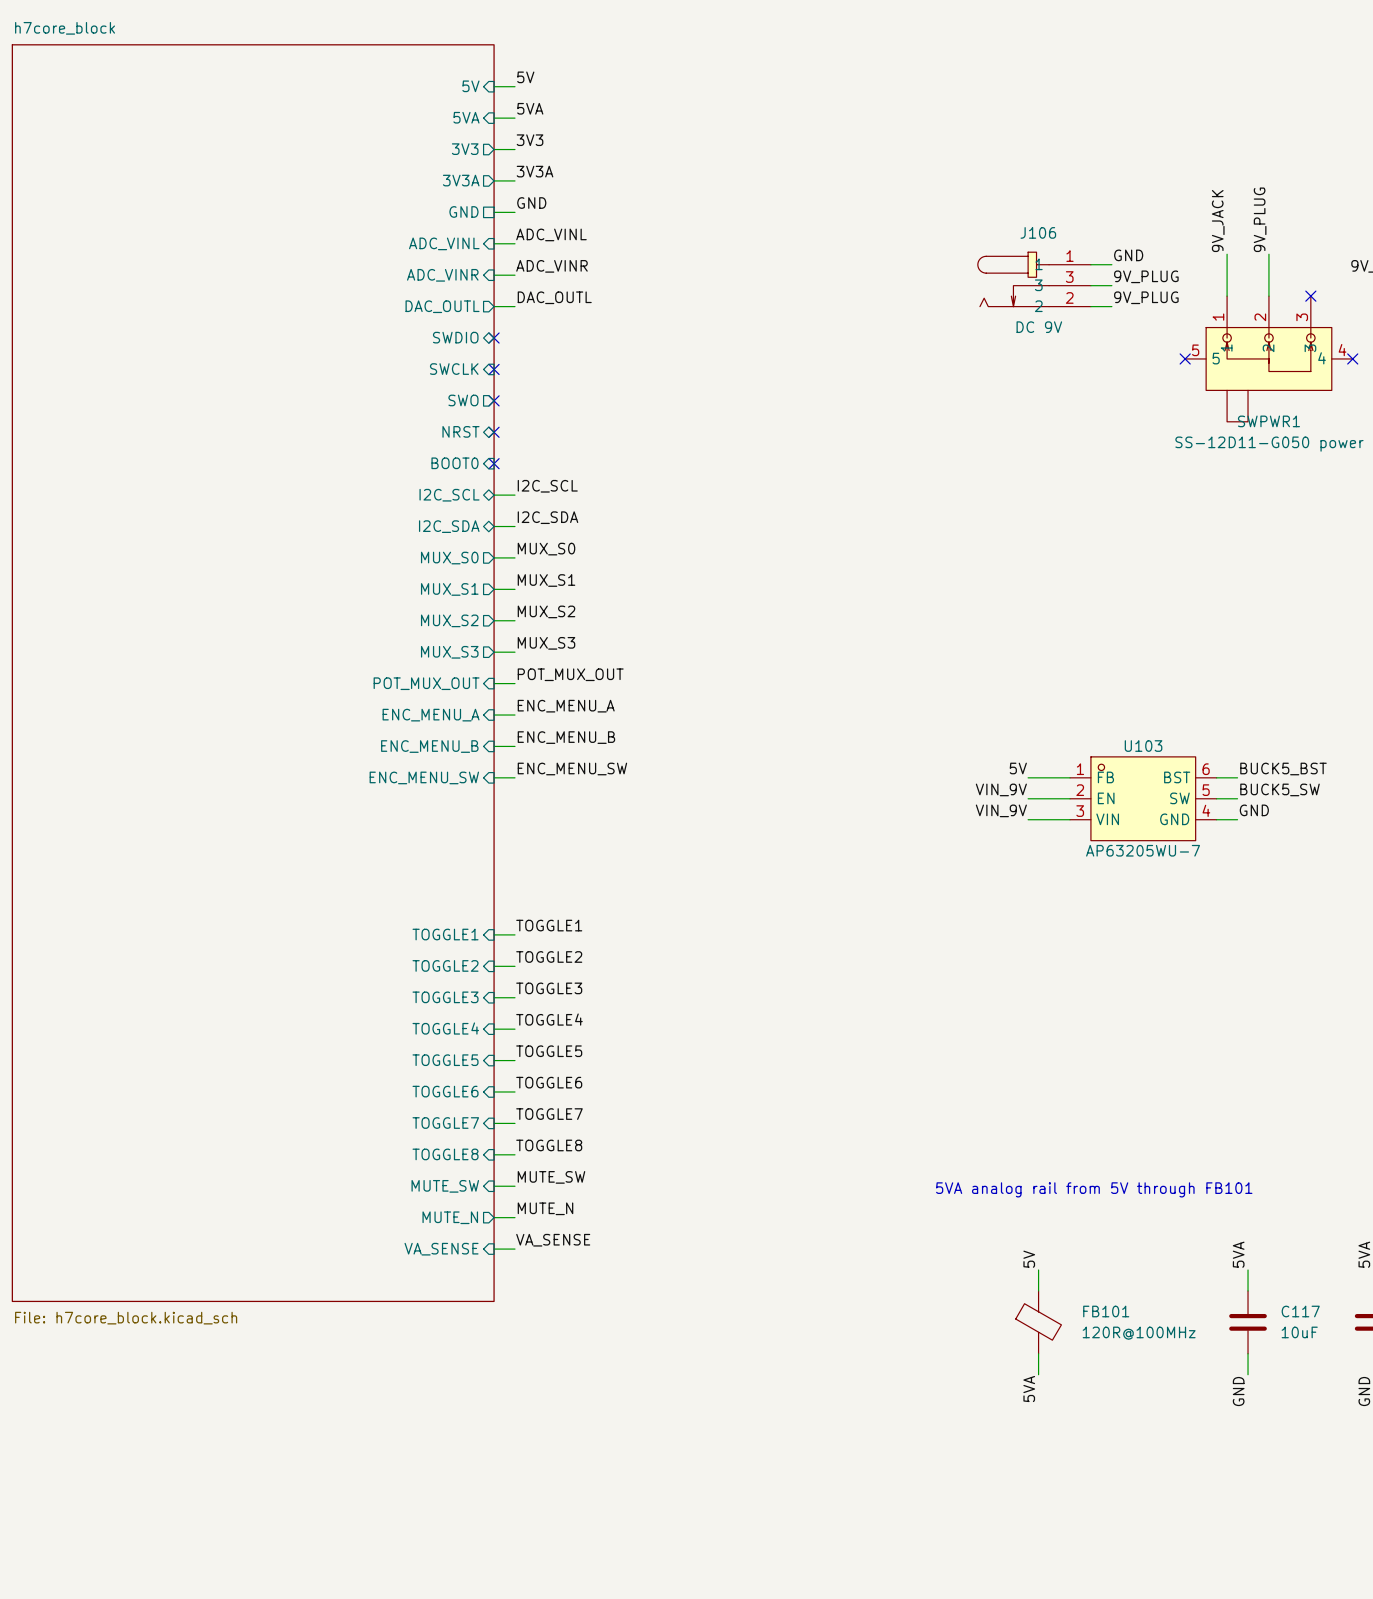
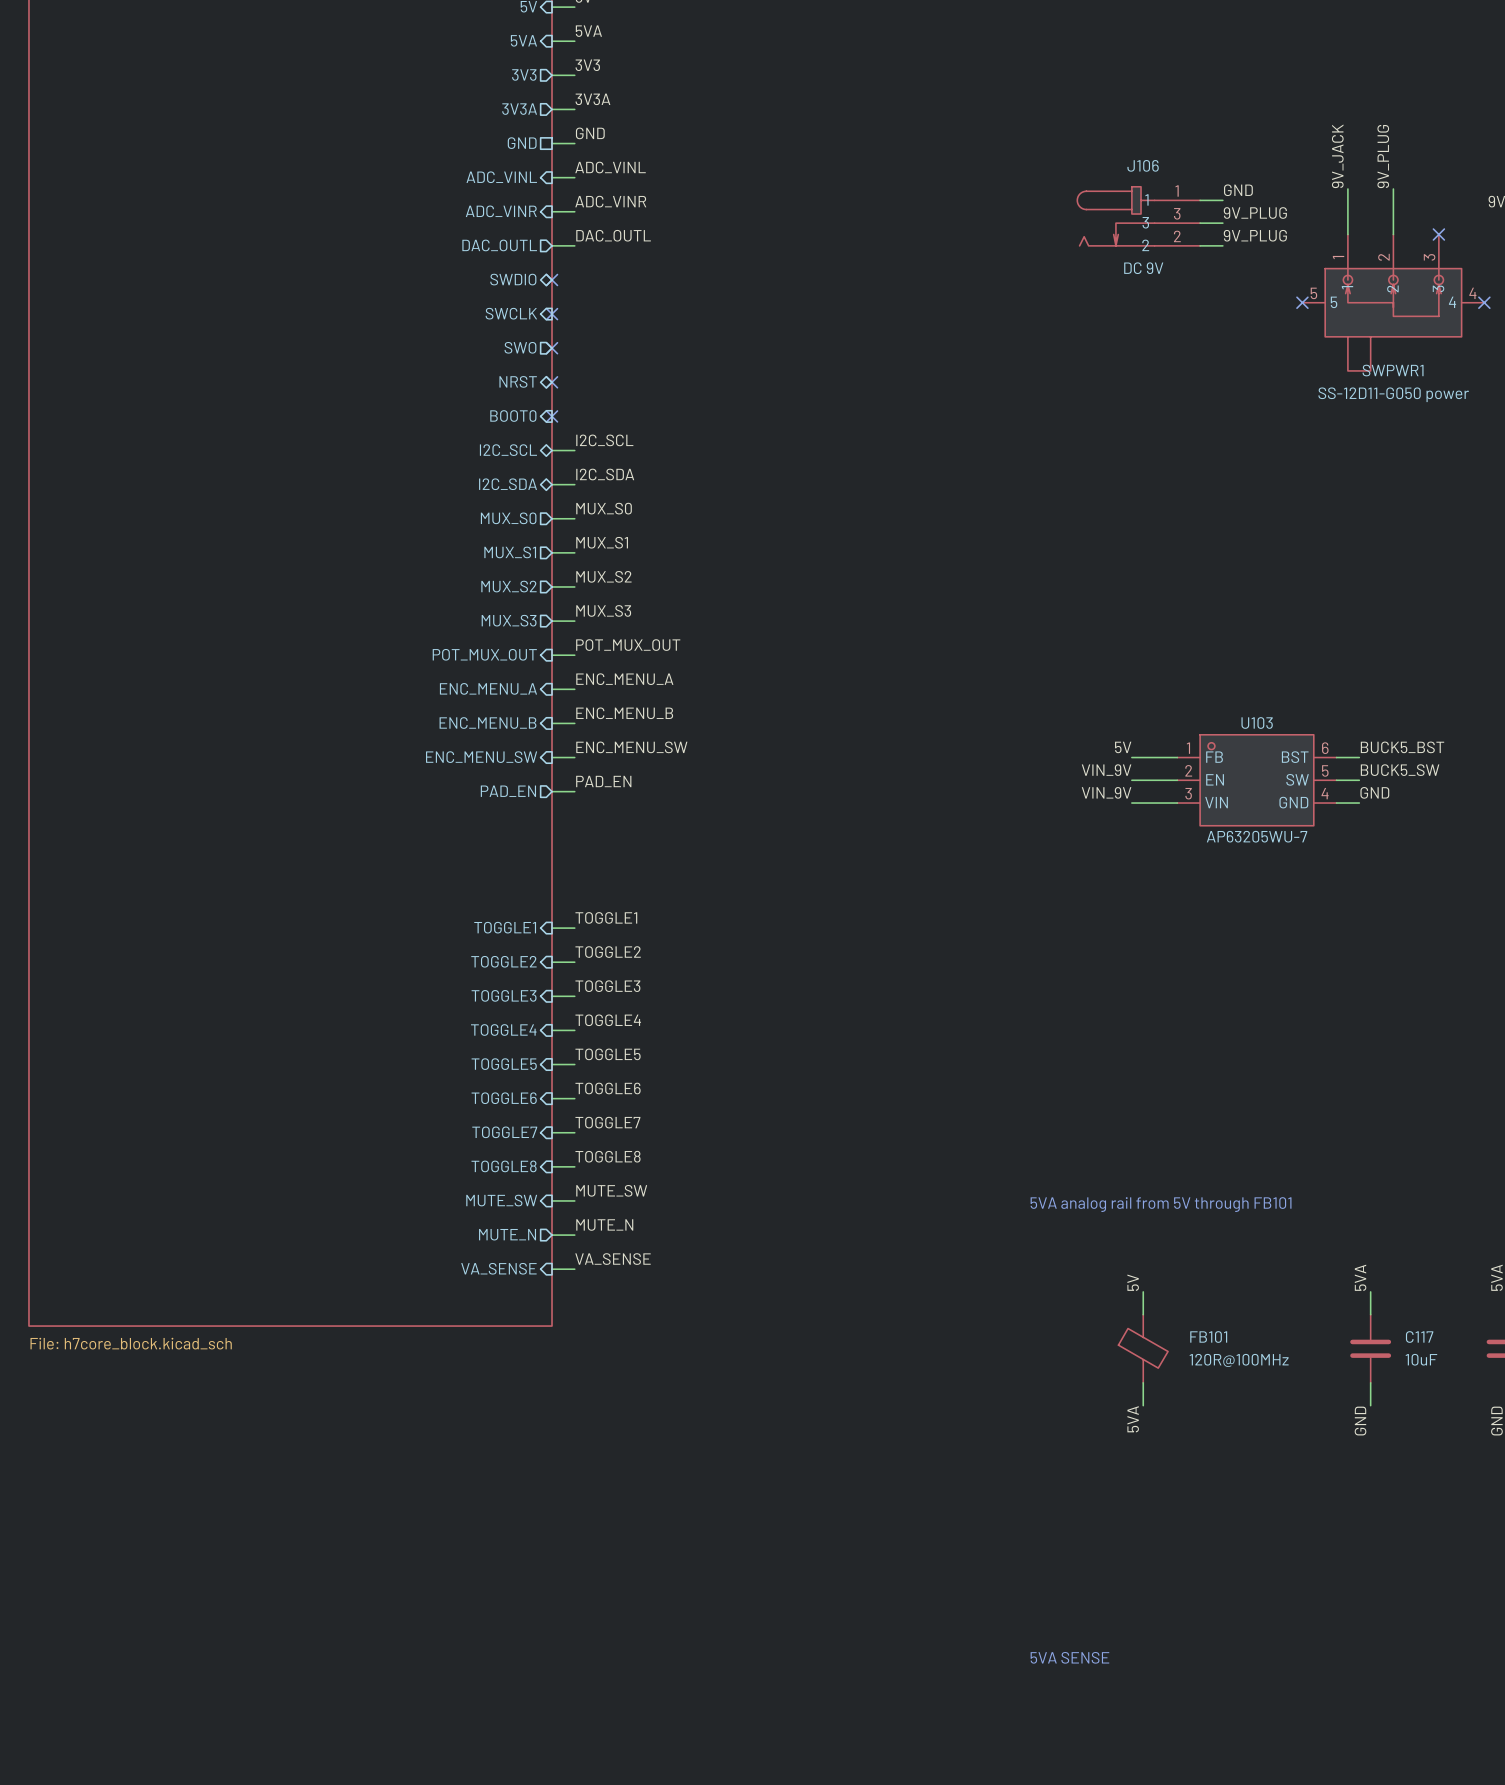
label: none -> PAD_EN (603, 781)
sheet pin: none -> PAD_EN (508, 791)
wire: none -> (552, 791) (574, 791)

